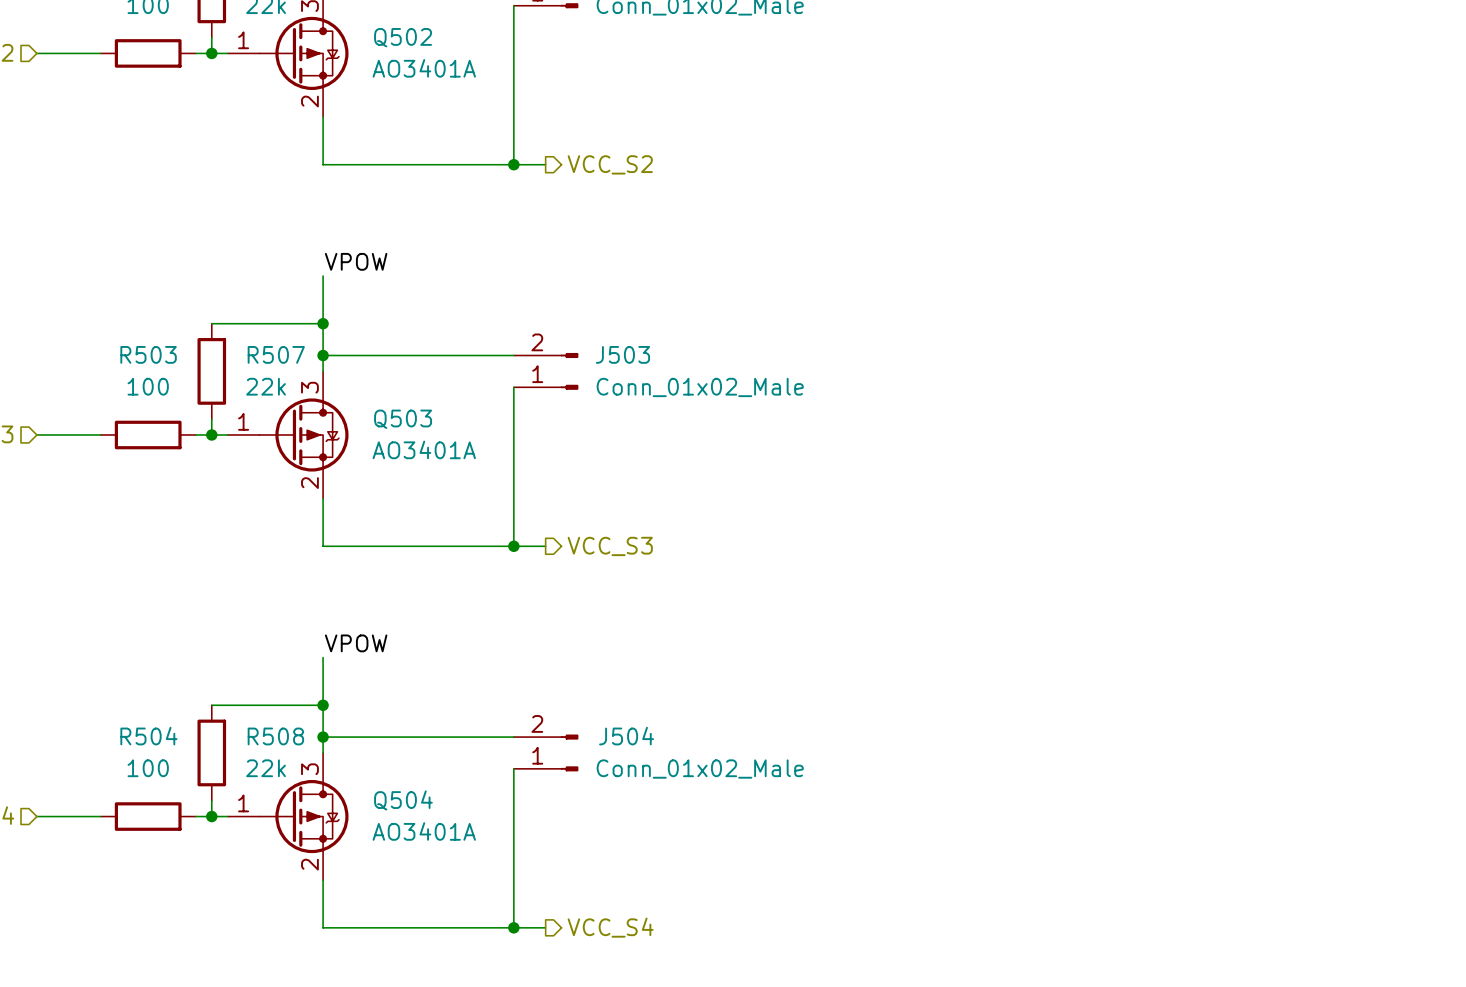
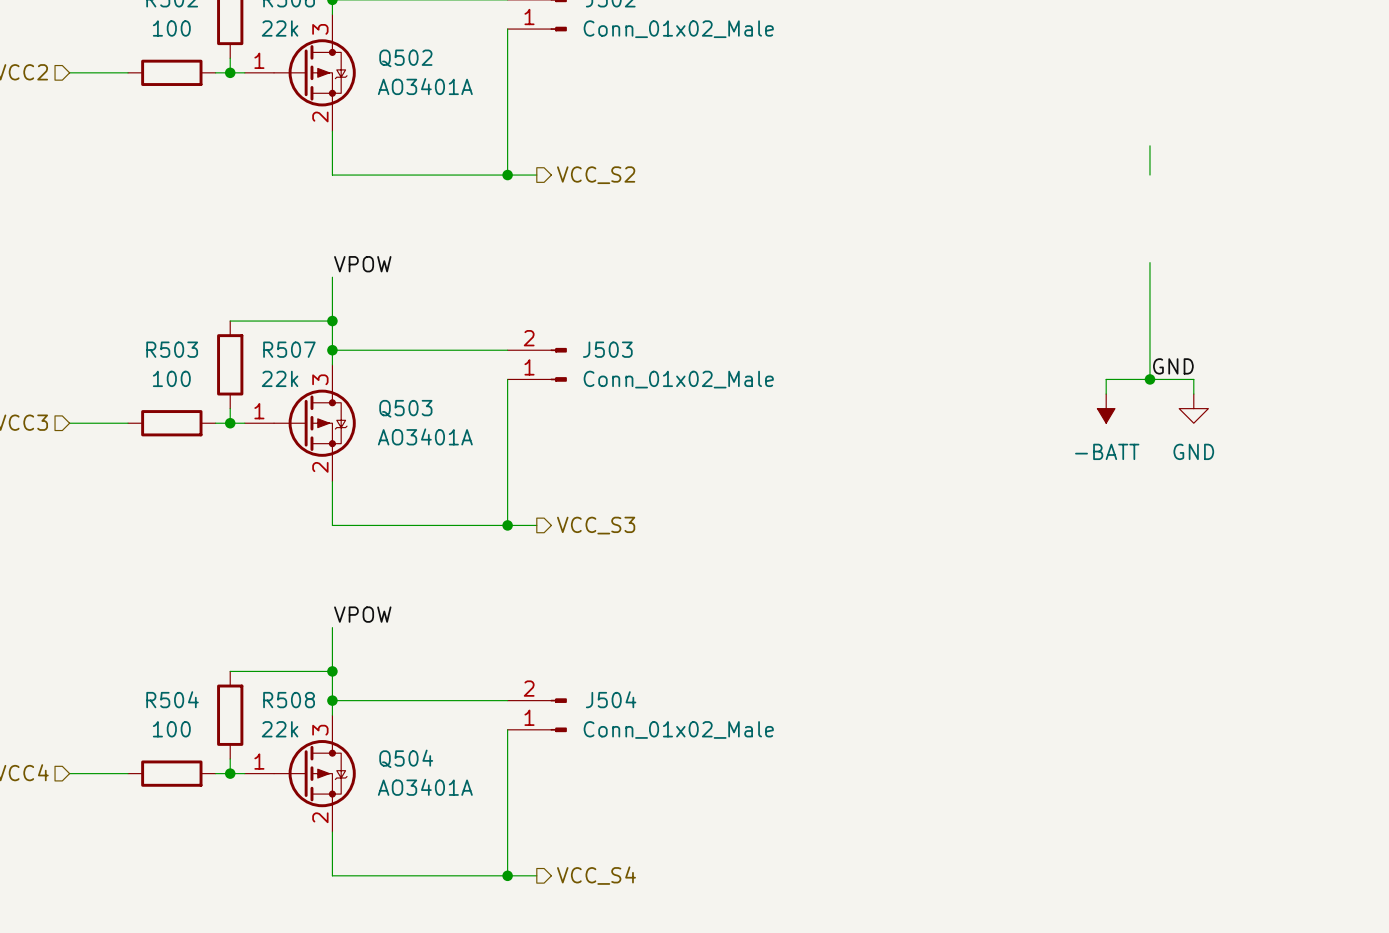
wire: none -> (1149, 145) (1149, 175)
wire: none -> (1149, 262) (1149, 379)
label: none -> GND (1173, 366)
junction: none -> (1149, 379)
wire: none -> (1106, 394) (1106, 379) (1193, 379) (1193, 394)
power symbol: none -> -BATT (1106, 408)
power symbol: none -> GND (1193, 408)

